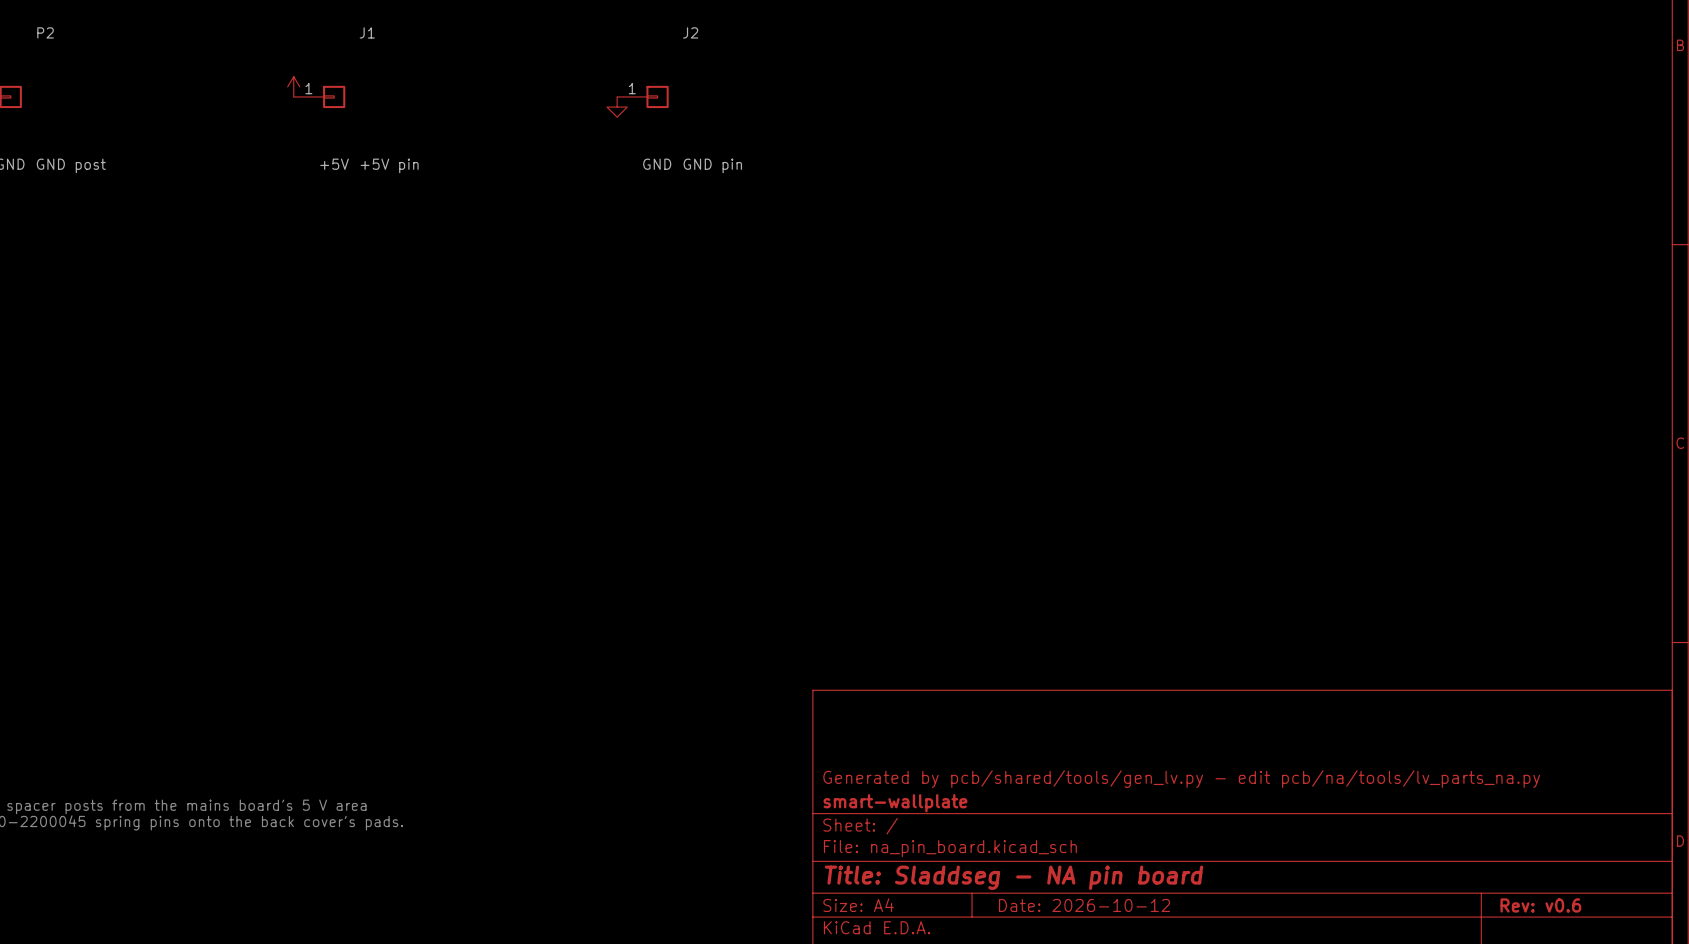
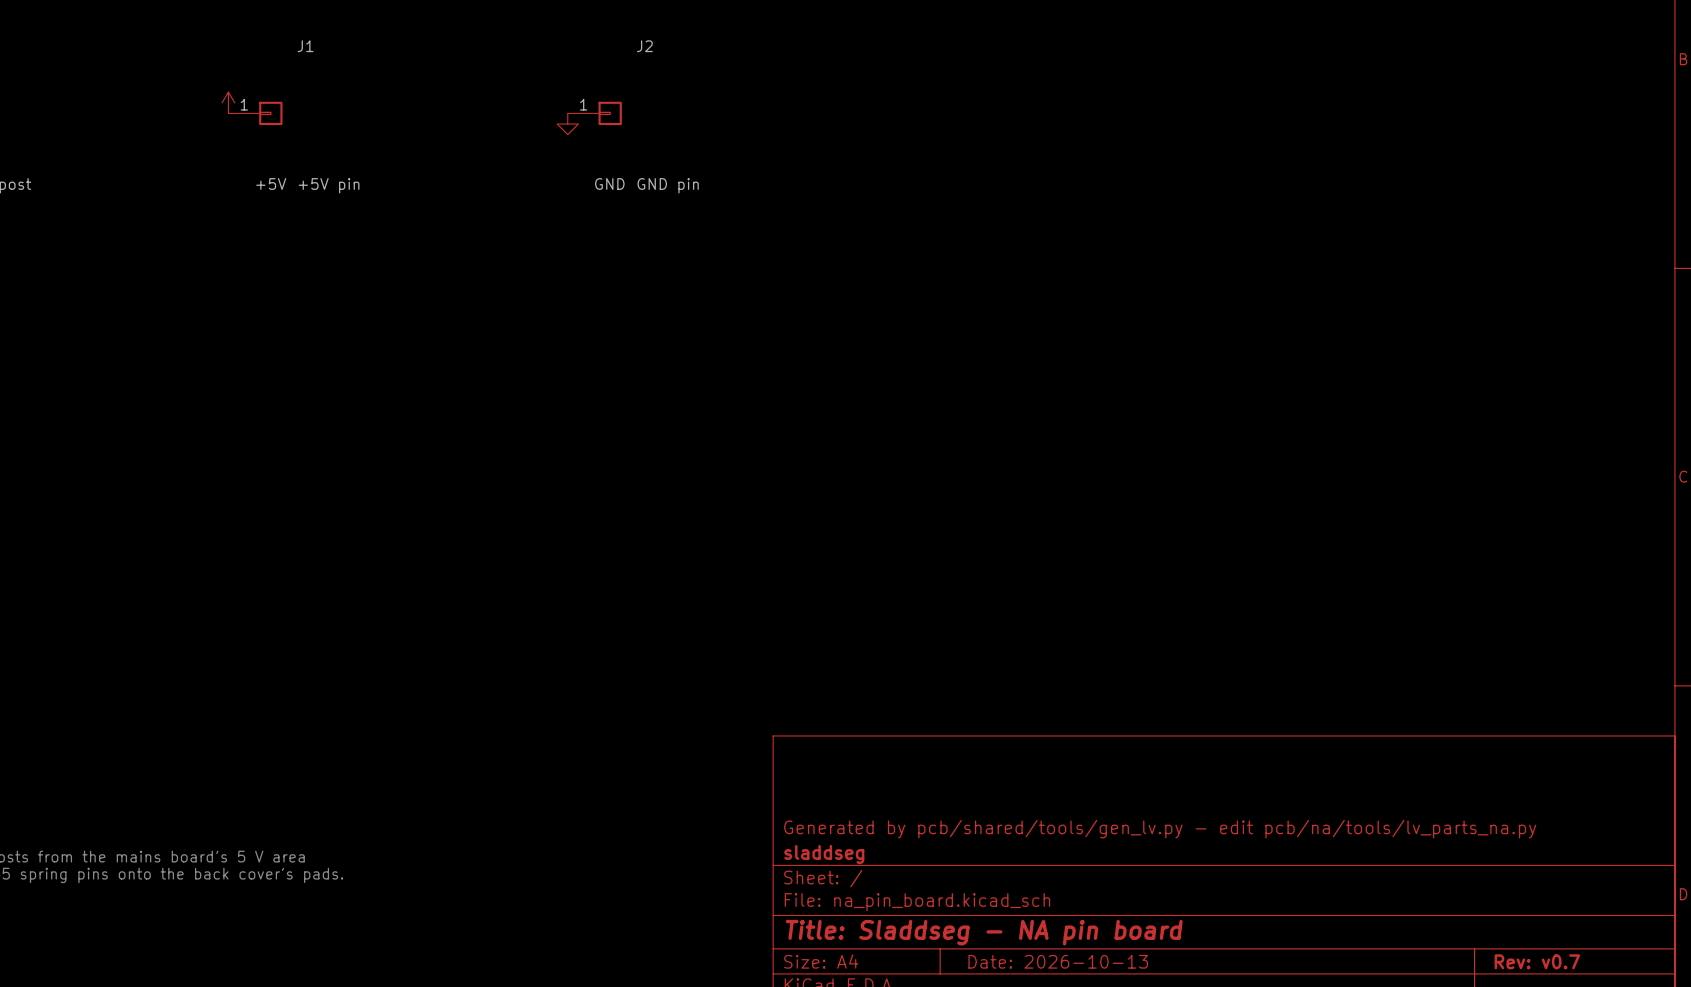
title block: smart-wallplate (895, 803) -> sladdseg (824, 854)
title block: Date: 2026-10-12 (1084, 905) -> Date: 2026-10-13 (1058, 961)
title block: Rev: v0.6 (1540, 905) -> Rev: v0.7 (1537, 961)

